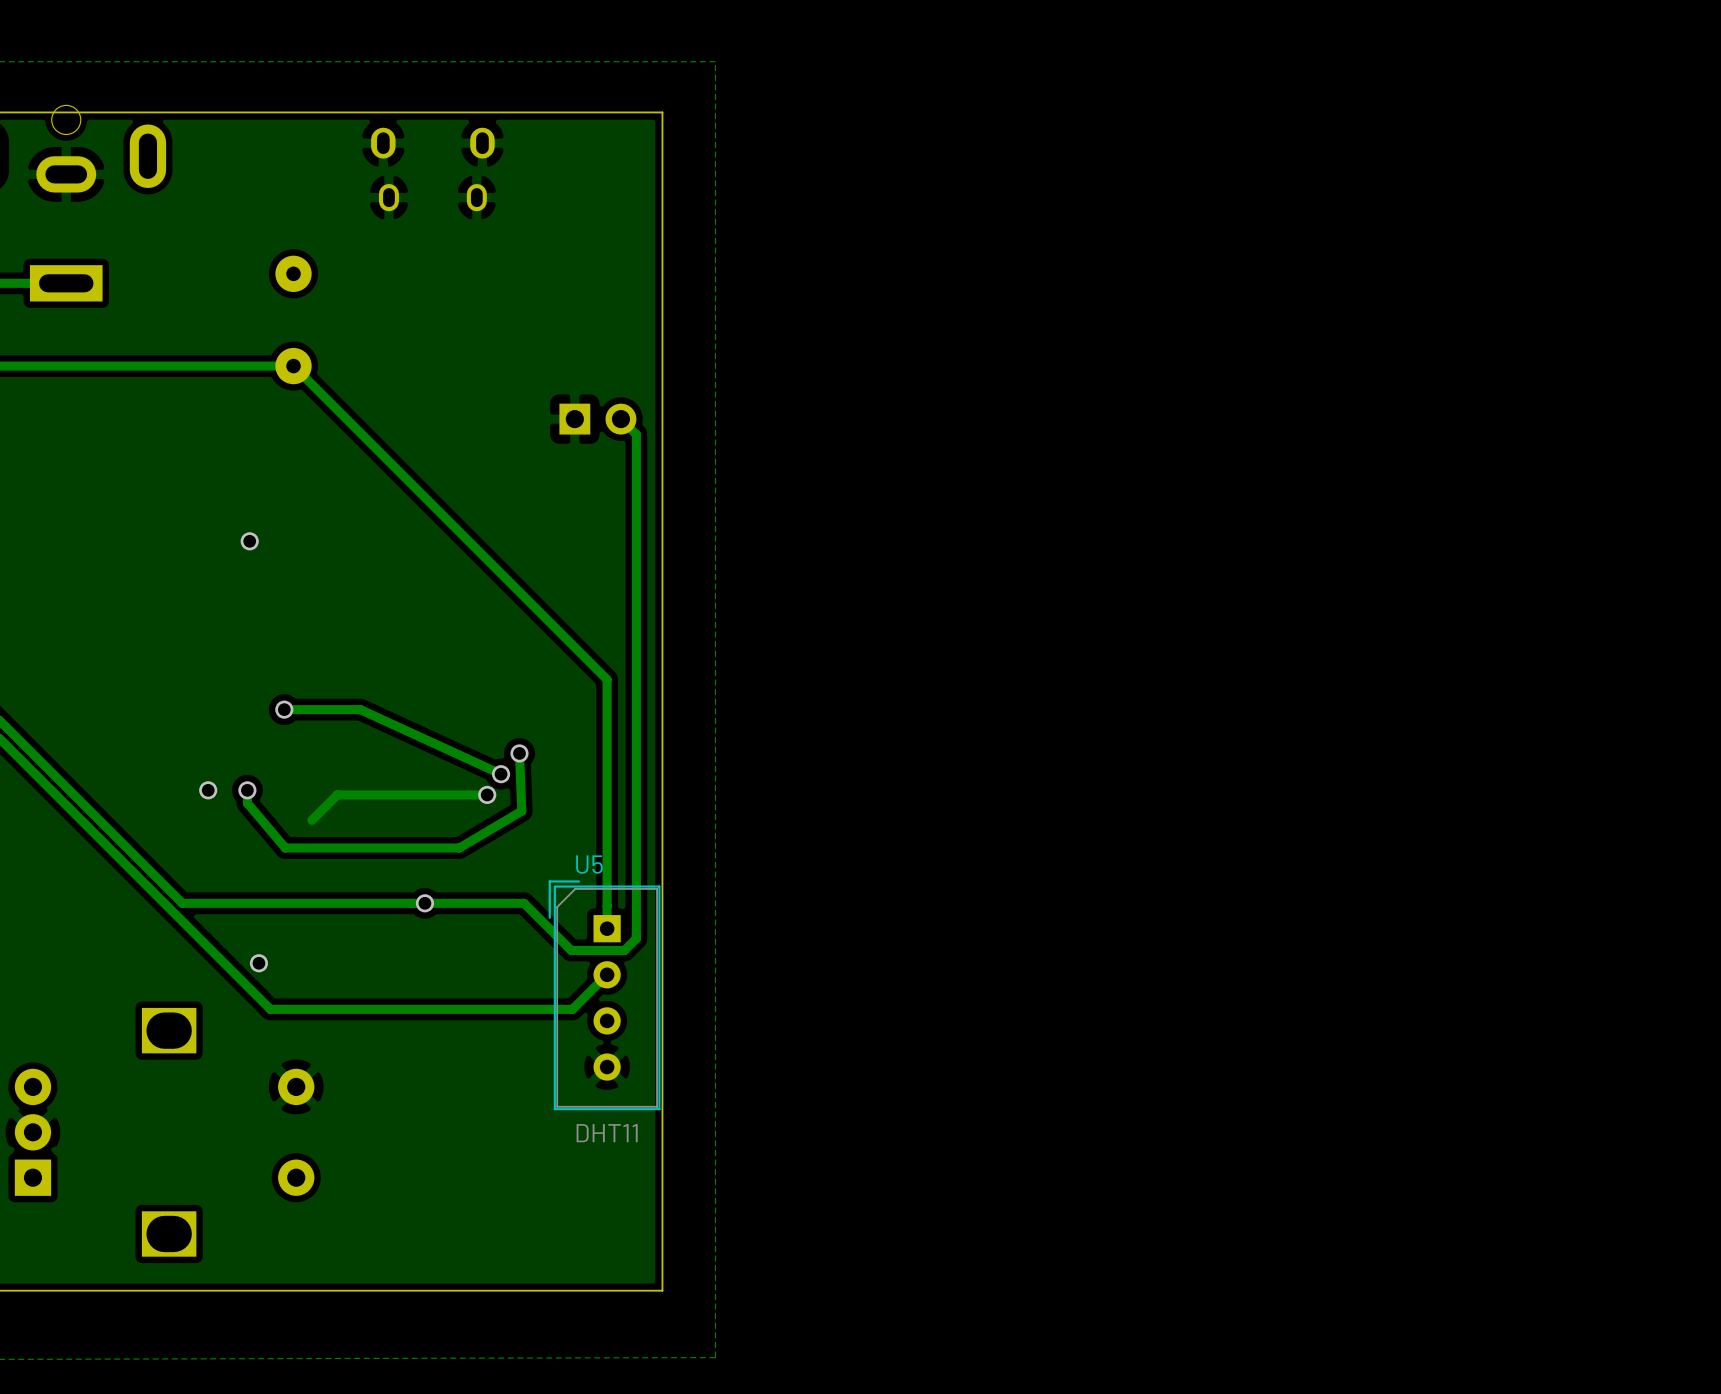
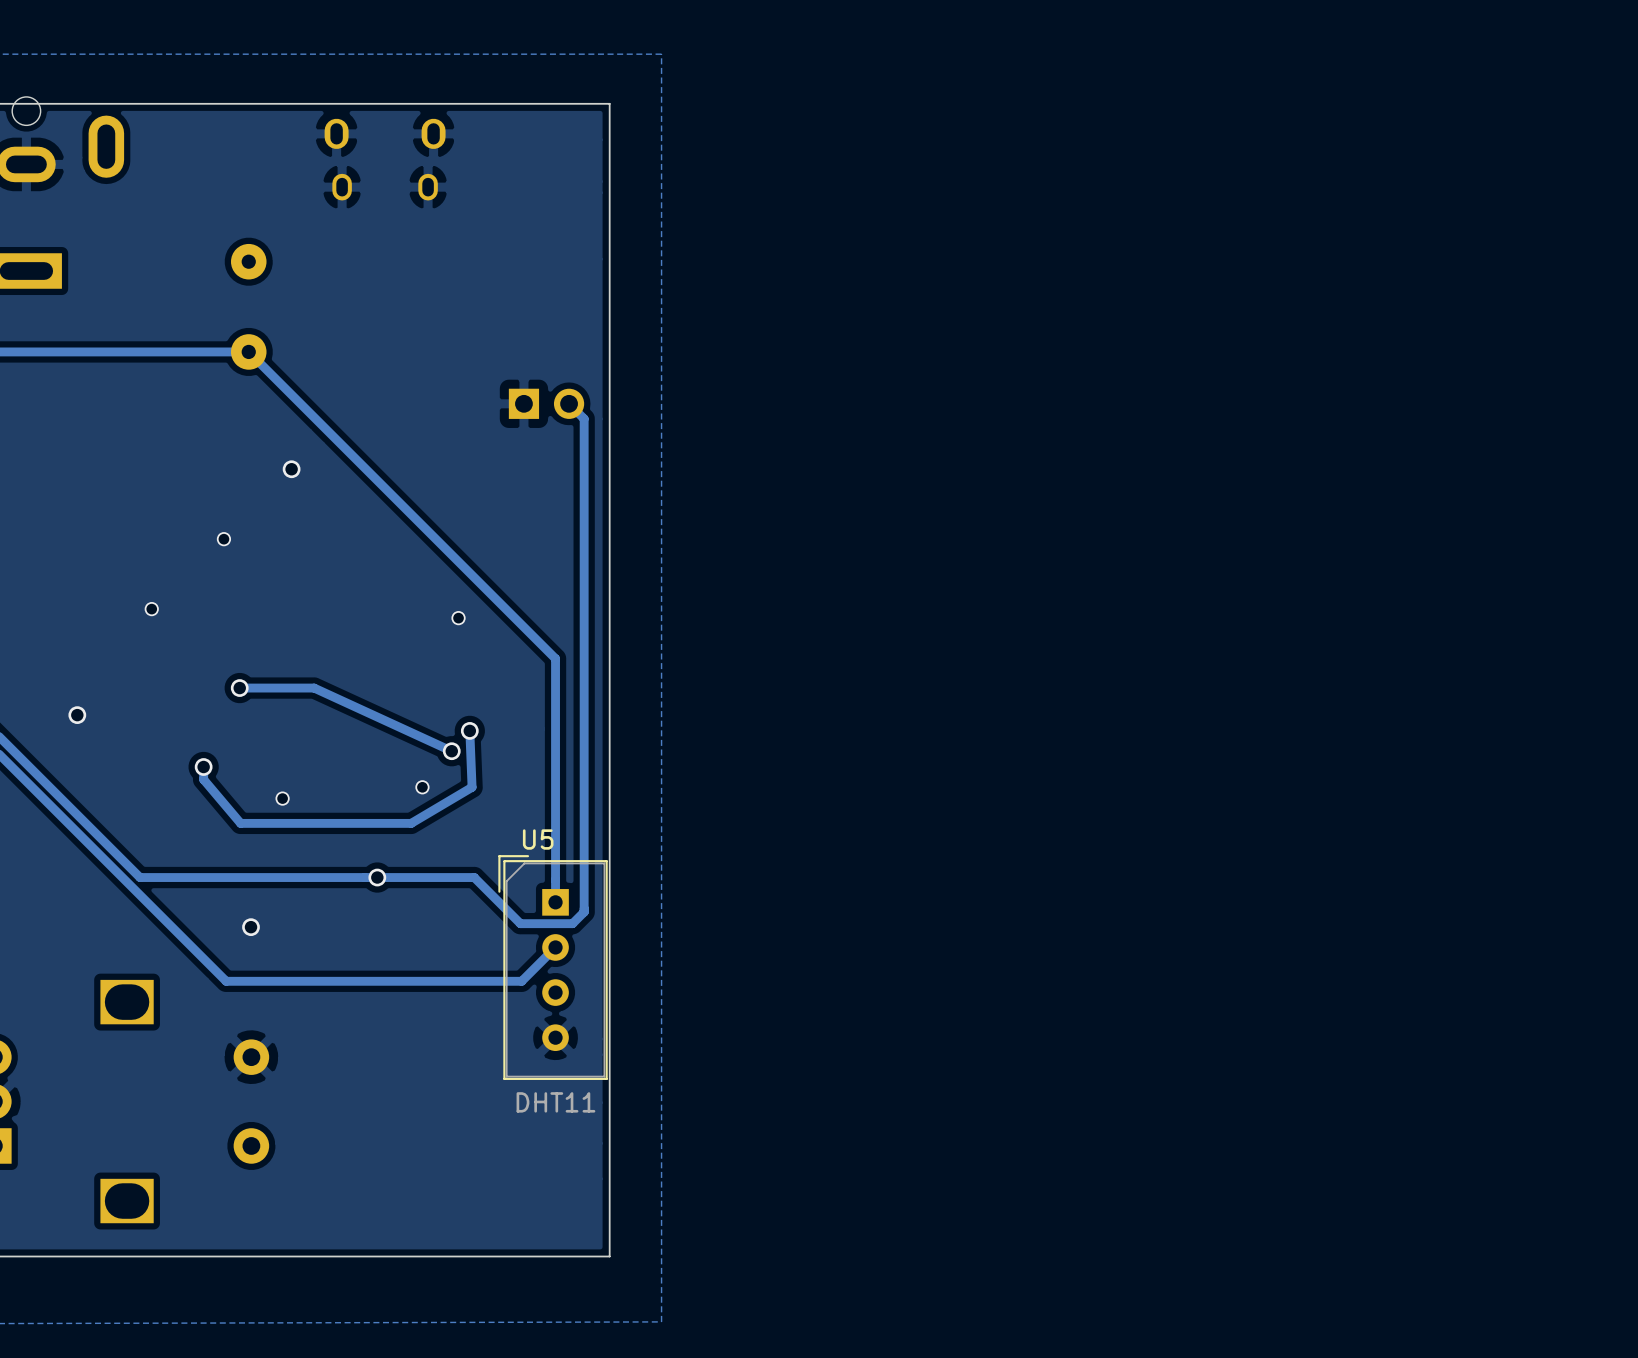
via position: (249, 541) -> (291, 469)
via: none -> (223, 539)
via: none -> (151, 609)
via: none -> (458, 618)
via: none -> (77, 715)
via: (208, 790) -> none
track: (487, 794) (337, 794) (311, 820) -> none
via: (487, 794) -> none
via: none -> (422, 787)
via: none -> (282, 798)
via position: (258, 963) -> (251, 927)

